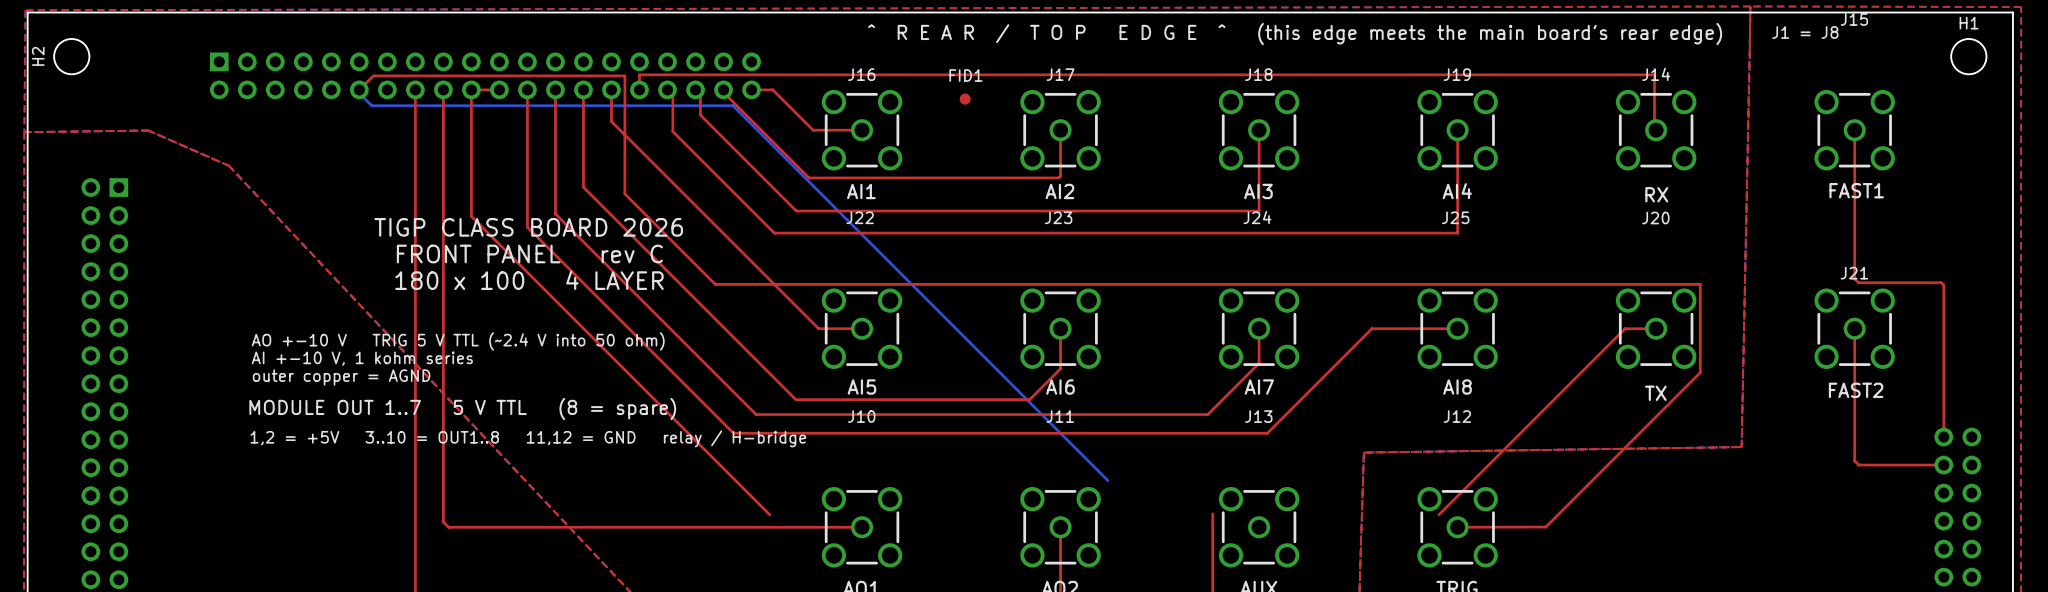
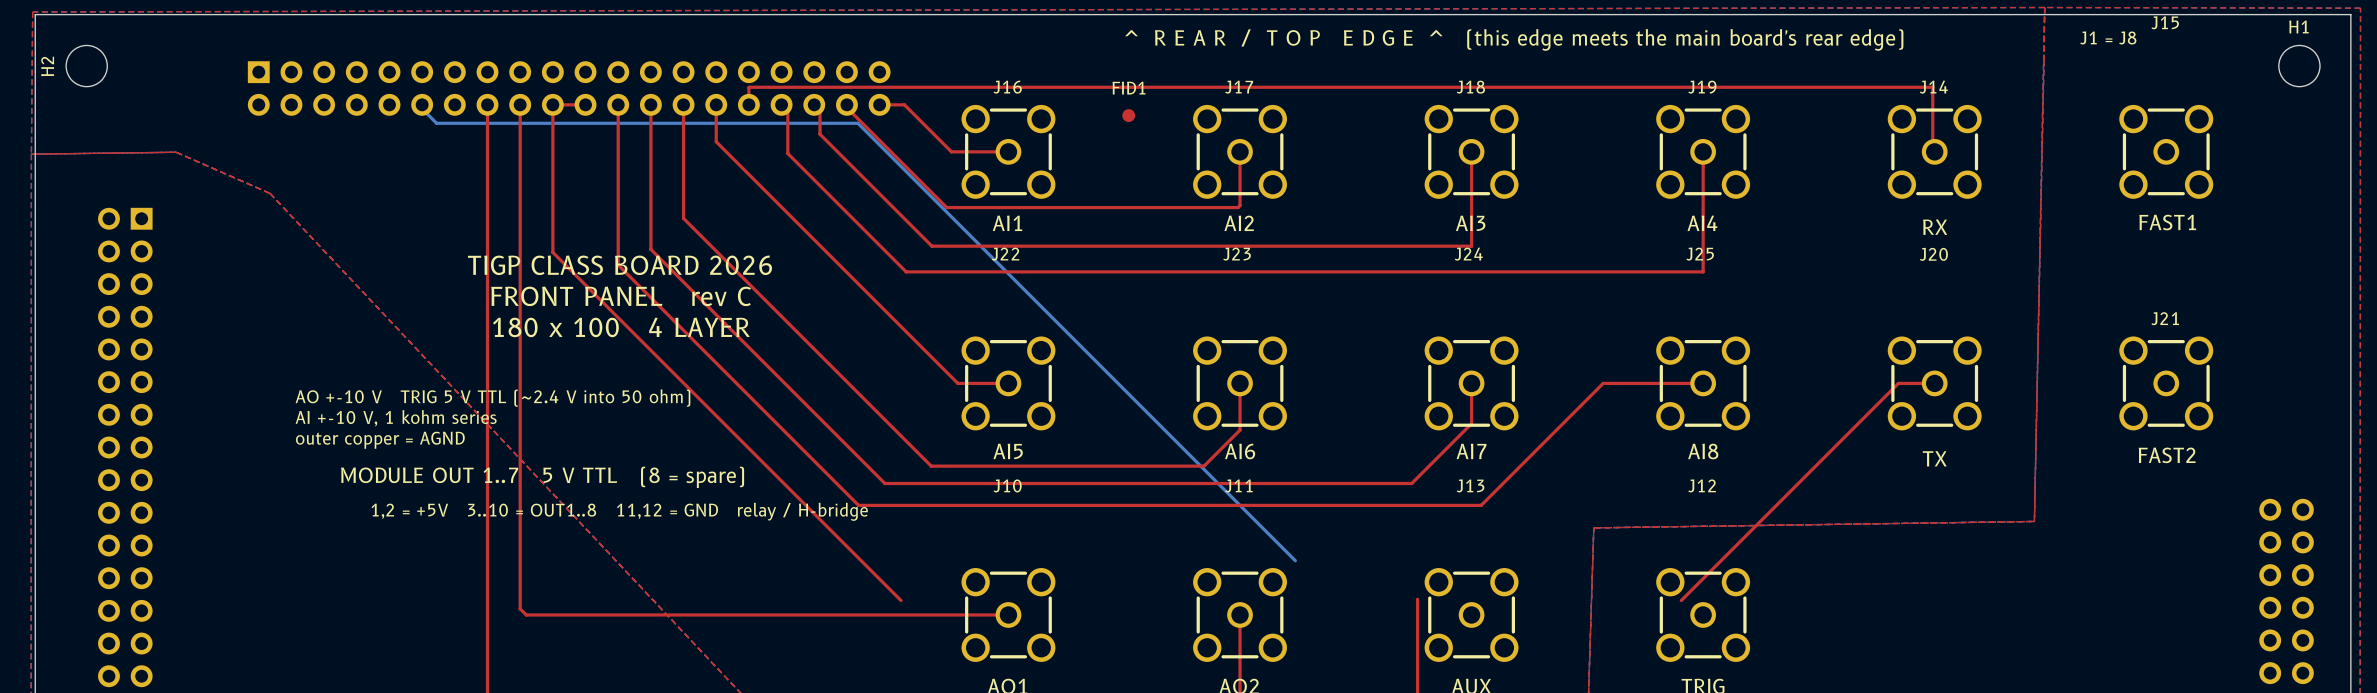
top track: (359, 89) (373, 75) (624, 75) (624, 193) (715, 284) (1700, 284) (1700, 372) (1545, 527) (1457, 527) -> none
top track: (1854, 130) (1854, 278) (1858, 282) (1941, 282) (1943, 285) (1943, 437) -> none
top track: (1854, 328) (1854, 460) (1858, 465) (1943, 465) -> none

